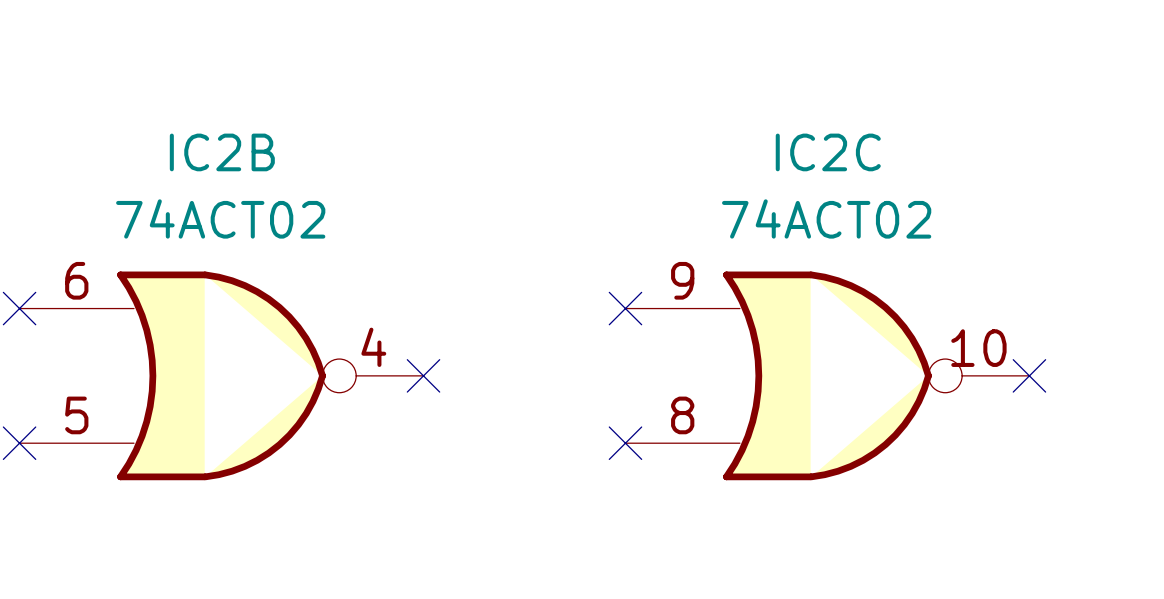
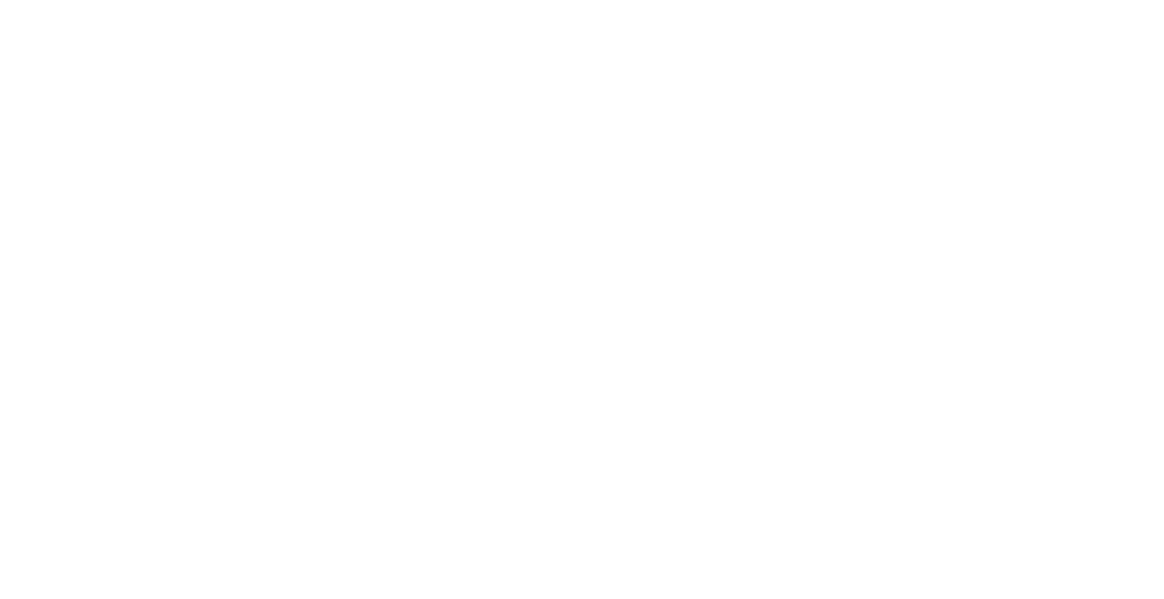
no-connect mark: (19, 308) -> none
no-connect mark: (625, 308) -> none
IC2B: 74ACT02 (221, 375) -> none
no-connect mark: (423, 375) -> none
IC2C: 74ACT02 (827, 375) -> none
no-connect mark: (1029, 375) -> none
no-connect mark: (19, 443) -> none
no-connect mark: (625, 443) -> none

